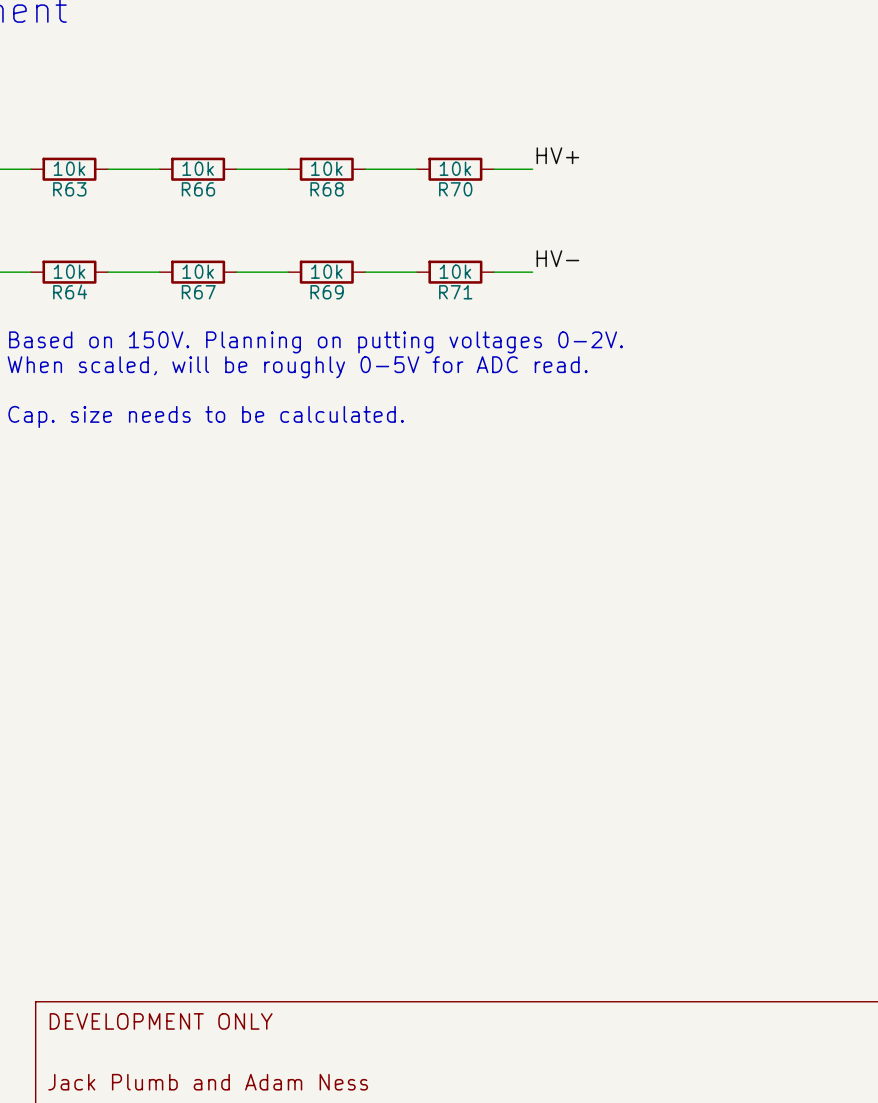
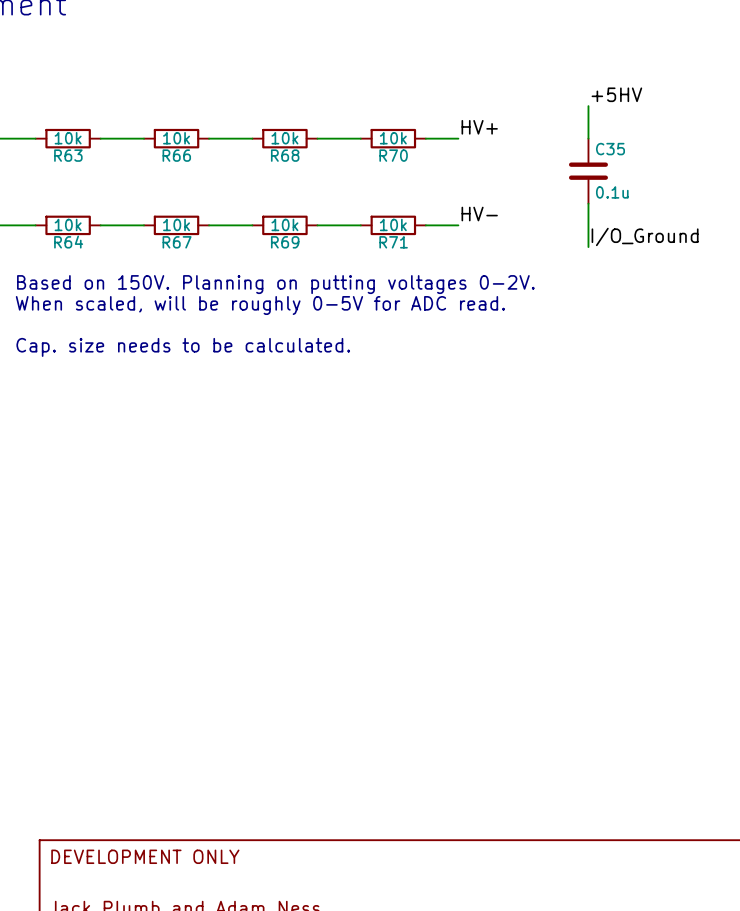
label: none -> +5HV (616, 94)
wire: none -> (588, 106) (588, 138)
C35: none -> 0.1u (588, 171)
wire: none -> (588, 203) (588, 247)
label: none -> I/O_Ground (645, 236)

